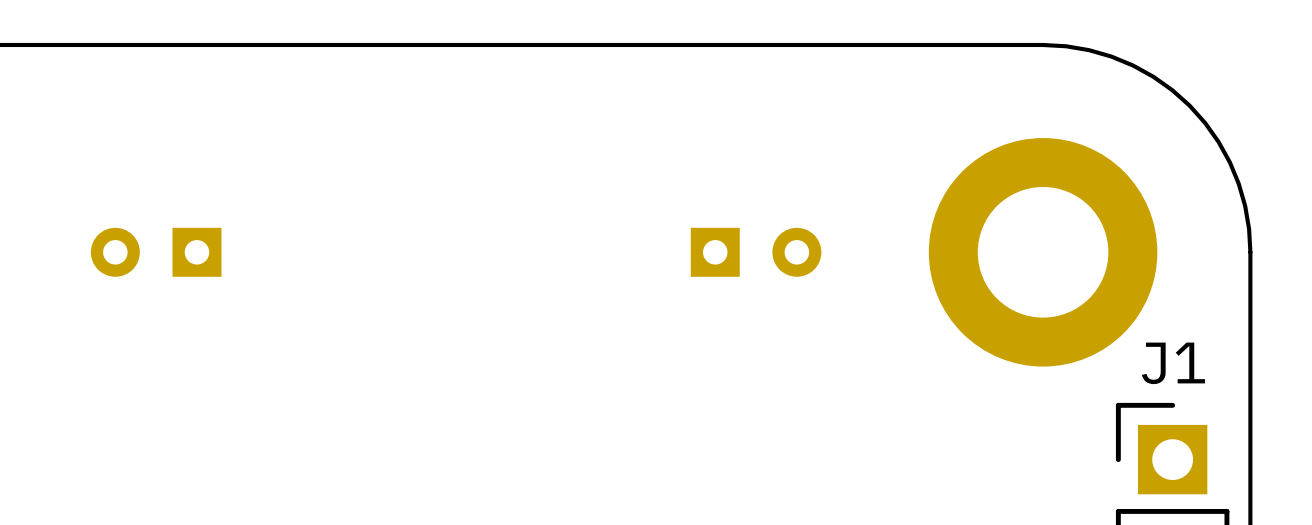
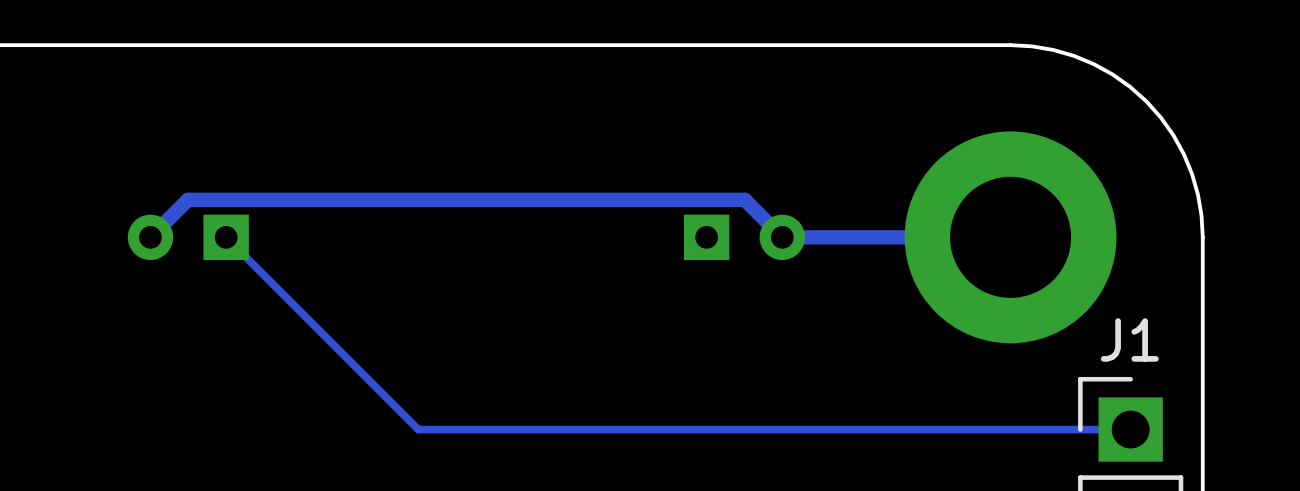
track: none -> (226, 237) (418, 429) (1130, 429)
track: none -> (1010, 237) (782, 237) (744, 199) (188, 199) (150, 237)

